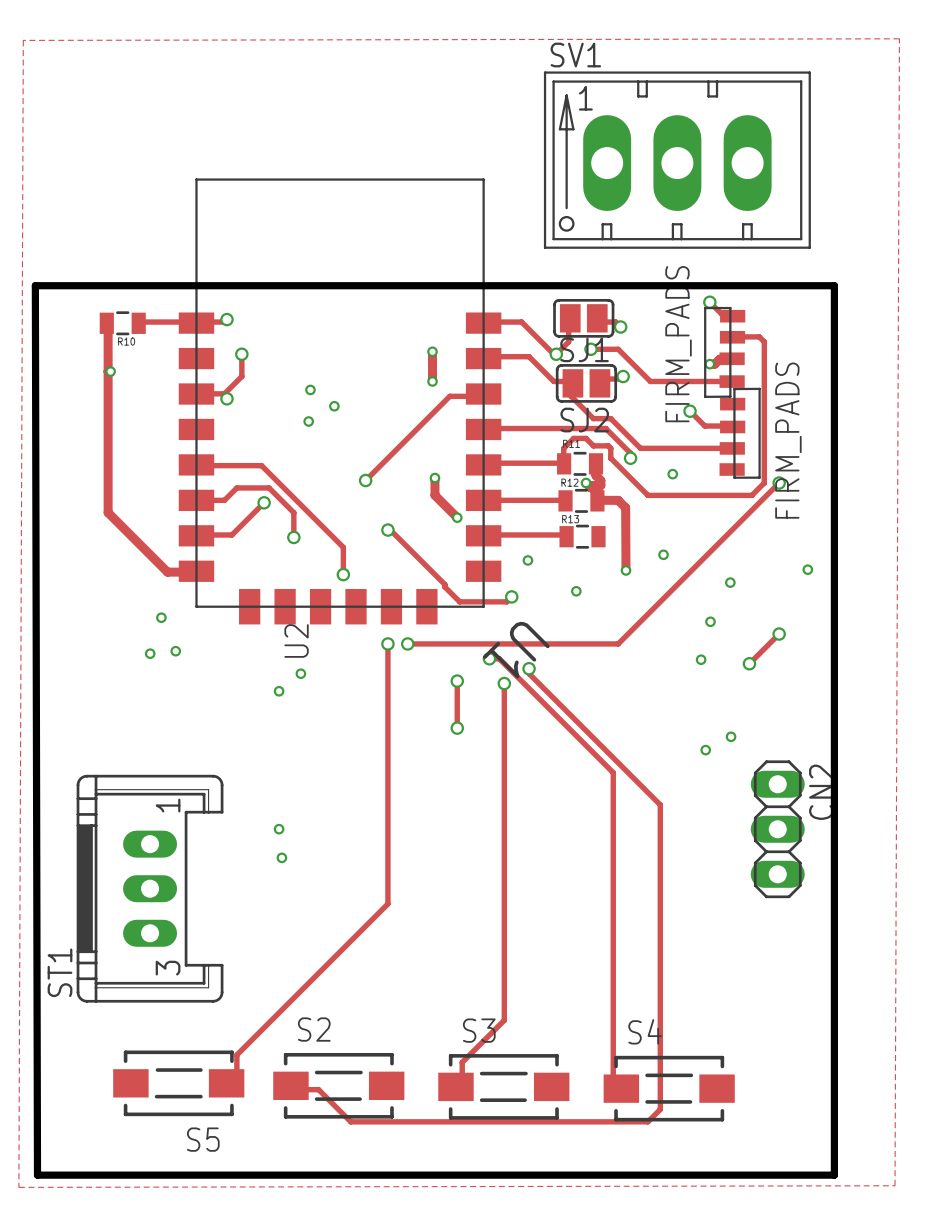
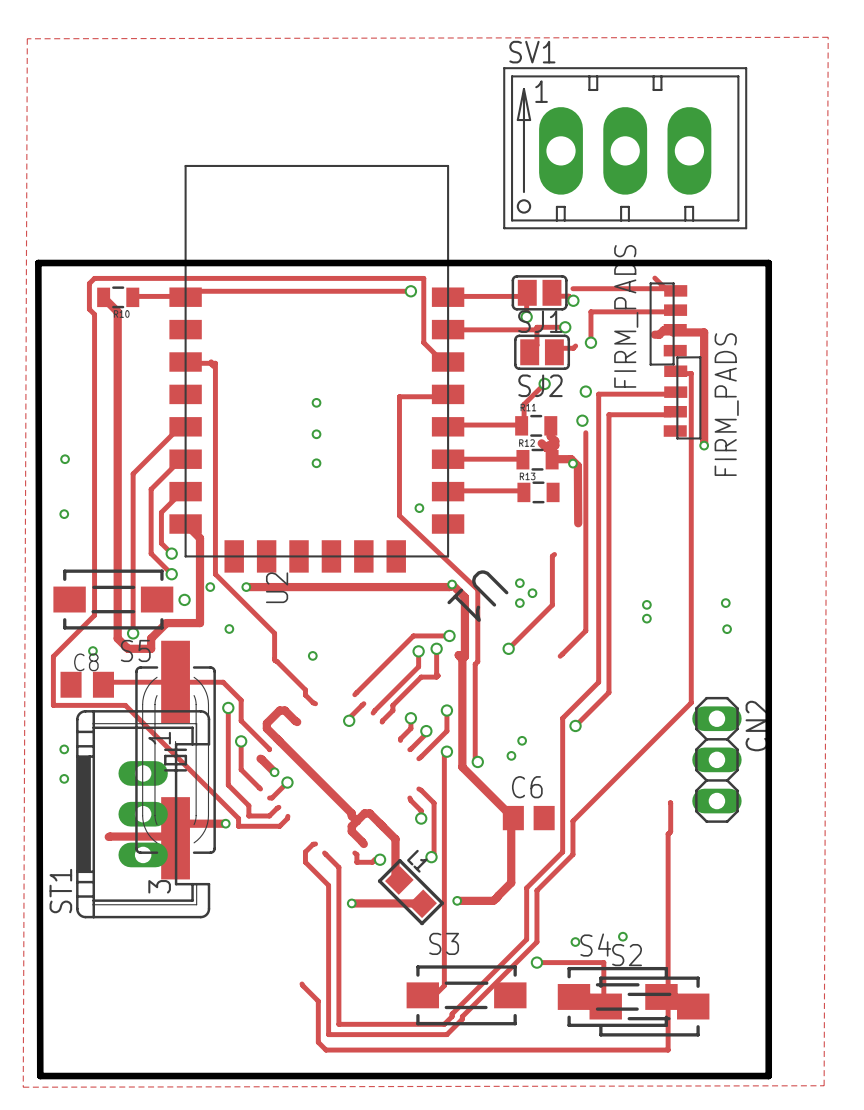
via: (709, 302) -> none
track: none -> (572, 288) (670, 288) (671, 291)
via: none -> (410, 291)
track: (570, 318) (568, 341) (556, 354) (553, 354) (521, 322) (483, 323) -> (526, 317) (527, 292) (526, 296) (448, 297)
track: (226, 319) (224, 322) (138, 323) -> (410, 291) (187, 291) (185, 297) (132, 297)
via: (226, 319) -> none
track: (106, 323) (108, 512) (167, 572) (196, 571) -> (103, 297) (117, 311) (117, 638) (127, 648) (151, 648) (151, 638) (166, 623) (200, 623) (200, 538) (185, 524)
track: none -> (671, 310) (670, 311) (590, 311) (590, 342)
track: (732, 337) (759, 336) (764, 341) (764, 483) (751, 495) (647, 495) (610, 458) (610, 448) (608, 445) (593, 445) (586, 438) (573, 438) (563, 448) (564, 463) (484, 463) (483, 464) -> (544, 383) (524, 404) (524, 425) (449, 425) (448, 426)
track: (590, 349) (618, 349) (650, 381) (732, 381) -> none
via: (590, 349) -> none
track: (432, 351) (432, 381) -> none
via: (432, 351) -> none
track: (241, 354) (241, 376) (224, 393) (196, 394) -> (315, 703) (305, 695) (305, 689) (274, 660) (274, 633) (215, 574) (215, 363) (185, 362)
via: (241, 354) -> none
via position: (556, 354) -> (526, 317)
track: none -> (565, 327) (536, 327) (536, 345) (529, 352)
via: none -> (565, 327)
track: (483, 358) (484, 356) (529, 356) (553, 381) (571, 381) (572, 383) (571, 383) (571, 396) (593, 418) (610, 418) (640, 448) (732, 448) -> (448, 329) (536, 329)
track: none -> (671, 329) (673, 332) (704, 332) (704, 445)
via: (709, 364) -> none
via: (110, 371) -> none
via: none -> (590, 342)
via: (623, 376) -> none
via: (432, 381) -> none
via: (310, 389) -> none
track: (483, 394) (482, 396) (449, 396) (365, 480) -> (448, 362) (441, 360) (423, 342) (423, 278) (94, 278) (89, 283) (89, 309) (94, 314) (94, 615) (53, 656) (53, 705) (125, 705) (238, 818) (238, 826) (279, 826) (287, 816)
via: (226, 398) -> none
track: none -> (672, 372) (691, 373) (691, 702) (572, 821) (572, 854) (536, 890) (536, 942) (446, 1034) (328, 1034) (328, 885) (305, 862) (305, 852) (315, 843)
via: (334, 406) -> none
track: (690, 411) (704, 426) (732, 426) -> none
via: (690, 411) -> none
via: none -> (544, 383)
via: (308, 421) -> none
via: none -> (585, 391)
track: none -> (672, 393) (598, 394) (598, 682) (562, 718) (562, 852) (526, 888) (526, 939) (452, 1014) (452, 1016) (444, 1024) (338, 1024) (338, 867) (324, 853)
track: (483, 429) (605, 428) (630, 453) (630, 458) -> (448, 394) (446, 396) (399, 396) (399, 515) (477, 589) (477, 661) (475, 664) (475, 759) (477, 761)
via: none -> (316, 402)
track: none -> (672, 412) (670, 414) (608, 414) (608, 692) (575, 725)
track: (196, 464) (261, 465) (343, 547) (343, 574) -> (185, 426) (179, 427) (133, 473) (133, 633)
track: none -> (585, 432) (585, 630) (560, 656)
via: none -> (316, 434)
via: (672, 474) -> none
track: (434, 478) (434, 495) (457, 517) -> none
via: (434, 478) -> none
via: (365, 480) -> none
via: (586, 483) -> none
track: (779, 483) (618, 643) (407, 643) -> none
via: (779, 483) -> none
via: none -> (704, 445)
via: none -> (65, 459)
track: (196, 500) (224, 500) (236, 487) (269, 487) (293, 512) (293, 537) -> (185, 459) (179, 461) (151, 489) (151, 553) (171, 574)
track: (264, 502) (231, 535) (196, 535) -> (171, 553) (161, 543) (161, 512) (184, 489) (185, 491)
via: (264, 502) -> none
via: none -> (316, 463)
via: none -> (572, 463)
via position: (457, 517) -> (419, 508)
track: (387, 530) (390, 530) (444, 584) (444, 587) (459, 601) (506, 601) (511, 596) -> none
via: (387, 530) -> none
via: (293, 537) -> none
via: (663, 554) -> none
via: none -> (64, 514)
via: (527, 560) -> none
via: (807, 569) -> none
via: (625, 570) -> none
via: (343, 574) -> none
via: (730, 582) -> none
via: (576, 591) -> none
via: (511, 596) -> none
via: none -> (171, 553)
track: none -> (554, 554) (552, 556) (552, 605) (508, 648)
via: (161, 617) -> none
via: (710, 621) -> none
via: none -> (171, 574)
track: (779, 634) (749, 663) -> none
via: (779, 634) -> none
via: none -> (519, 583)
via: none -> (452, 584)
via: none -> (210, 587)
track: none -> (246, 587) (449, 587) (452, 584) (464, 597) (464, 656) (458, 655) (462, 659) (462, 767) (513, 818) (511, 821) (511, 882) (493, 900) (457, 900)
via: none -> (246, 587)
track: (387, 643) (387, 903) (236, 1054) (236, 1072) (226, 1083) -> none
via: (387, 643) -> none
via: (407, 643) -> none
via: none -> (532, 593)
via: (175, 651) -> none
via: (150, 653) -> none
via: none -> (184, 599)
via: none -> (519, 603)
via: none -> (725, 603)
track: (489, 658) (499, 658) (613, 772) (613, 1079) (621, 1088) -> none
via: (489, 658) -> none
via: (749, 663) -> none
track: (529, 668) (529, 673) (660, 804) (660, 1109) (647, 1121) (350, 1121) (318, 1089) (293, 1089) (290, 1085) -> none
via: (529, 668) -> none
via: (300, 673) -> none
via: none -> (646, 618)
track: (457, 681) (457, 728) -> none
via: (457, 681) -> none
track: (504, 683) (504, 1020) (462, 1062) (462, 1079) (455, 1086) -> none
via: (504, 683) -> none
via: none -> (229, 629)
via: none -> (727, 629)
via: none -> (133, 633)
via: (279, 691) -> none
track: none -> (449, 635) (413, 635) (354, 694)
via: none -> (449, 635)
track: none -> (436, 648) (438, 675) (421, 677) (392, 705) (392, 710) (382, 722)
via: none -> (436, 648)
via: none -> (508, 648)
via: none -> (92, 651)
track: none -> (418, 651) (418, 666) (373, 713)
via: none -> (418, 651)
via: none -> (312, 655)
via: (457, 728) -> none
via: (731, 736) -> none
C8: none -> (87, 684)
track: none -> (103, 684) (104, 682) (223, 682) (241, 700) (241, 720) (269, 749)
via: (705, 750) -> none
track: none -> (363, 703) (349, 718) (349, 720)
track: none -> (228, 707) (228, 785) (248, 805) (248, 815) (269, 815) (278, 807)
via: none -> (228, 707)
track: none -> (446, 710) (446, 731) (418, 758)
via: none -> (446, 710)
track: none -> (410, 718) (410, 728) (400, 740)
via: none -> (410, 718)
via: none -> (349, 720)
track: none -> (297, 722) (284, 710) (279, 710) (266, 723) (266, 728) (351, 813) (356, 821)
via: none -> (575, 725)
track: none -> (426, 731) (426, 733) (409, 749)
via: none -> (426, 731)
via: none -> (522, 740)
track: none -> (241, 741) (241, 769) (260, 788)
via: none -> (241, 741)
via: none -> (64, 749)
track: none -> (446, 751) (444, 754) (444, 985) (427, 1002)
via: none -> (446, 751)
via: none -> (511, 755)
track: none -> (260, 758) (274, 772)
part: none -> (175, 760)
via: (279, 829) -> none
via: none -> (477, 761)
via: none -> (274, 772)
via: none -> (64, 778)
track: none -> (287, 782) (272, 797) (269, 798)
via: none -> (287, 782)
via: (281, 857) -> none
track: none -> (418, 788) (434, 803) (434, 854) (431, 857)
track: none -> (409, 798) (421, 810) (421, 818)
track: none -> (670, 802) (670, 831) (668, 833) (668, 1050) (326, 1050) (318, 1042) (318, 1001) (302, 984)
C6: none -> (528, 818)
via: none -> (421, 818)
track: none -> (225, 823) (176, 823) (175, 838) (171, 836) (108, 836)
via: none -> (225, 823)
track: none -> (363, 843) (351, 831) (351, 826) (364, 813) (369, 813) (395, 839) (395, 877) (399, 880)
track: none -> (354, 853) (356, 854) (356, 862) (372, 862) (374, 859) (380, 859)
via: none -> (431, 857)
via: none -> (380, 859)
L1: none -> (410, 892)
via: none -> (457, 900)
track: none -> (351, 903) (422, 903)
via: none -> (351, 903)
via: none -> (622, 936)
via: none -> (575, 942)
track: none -> (536, 962) (603, 962) (603, 1006) (605, 1006)
via: none -> (536, 962)
S5 position: (178, 1083) -> (113, 599)
S2 position: (338, 1085) -> (649, 1006)

